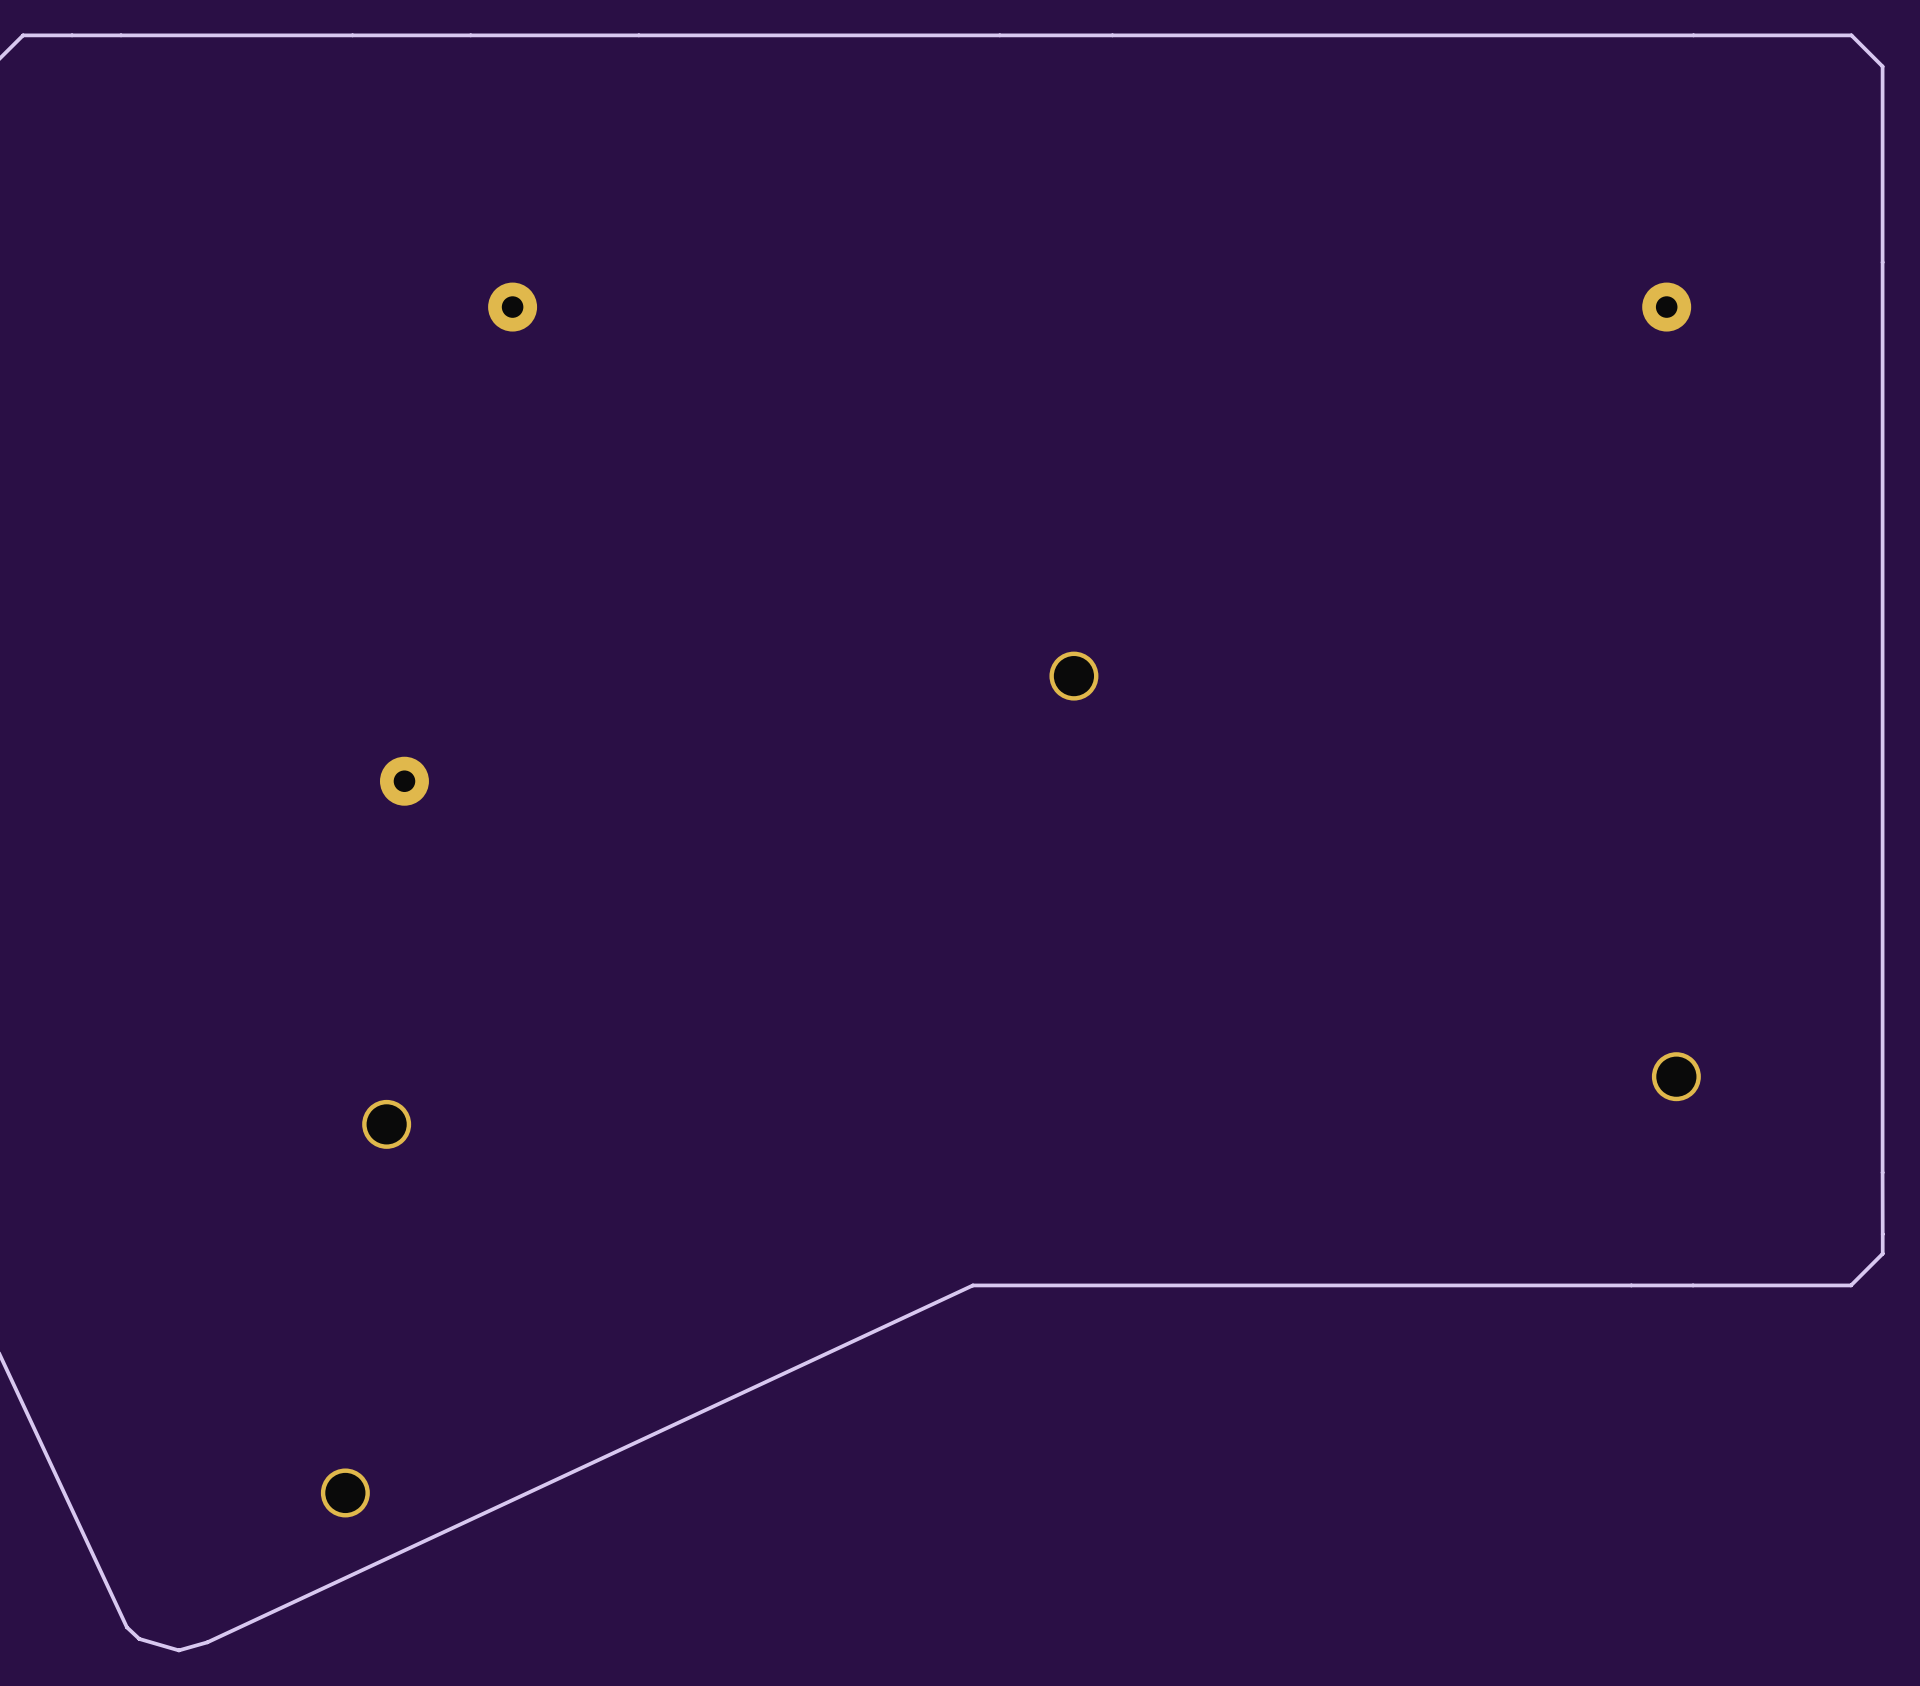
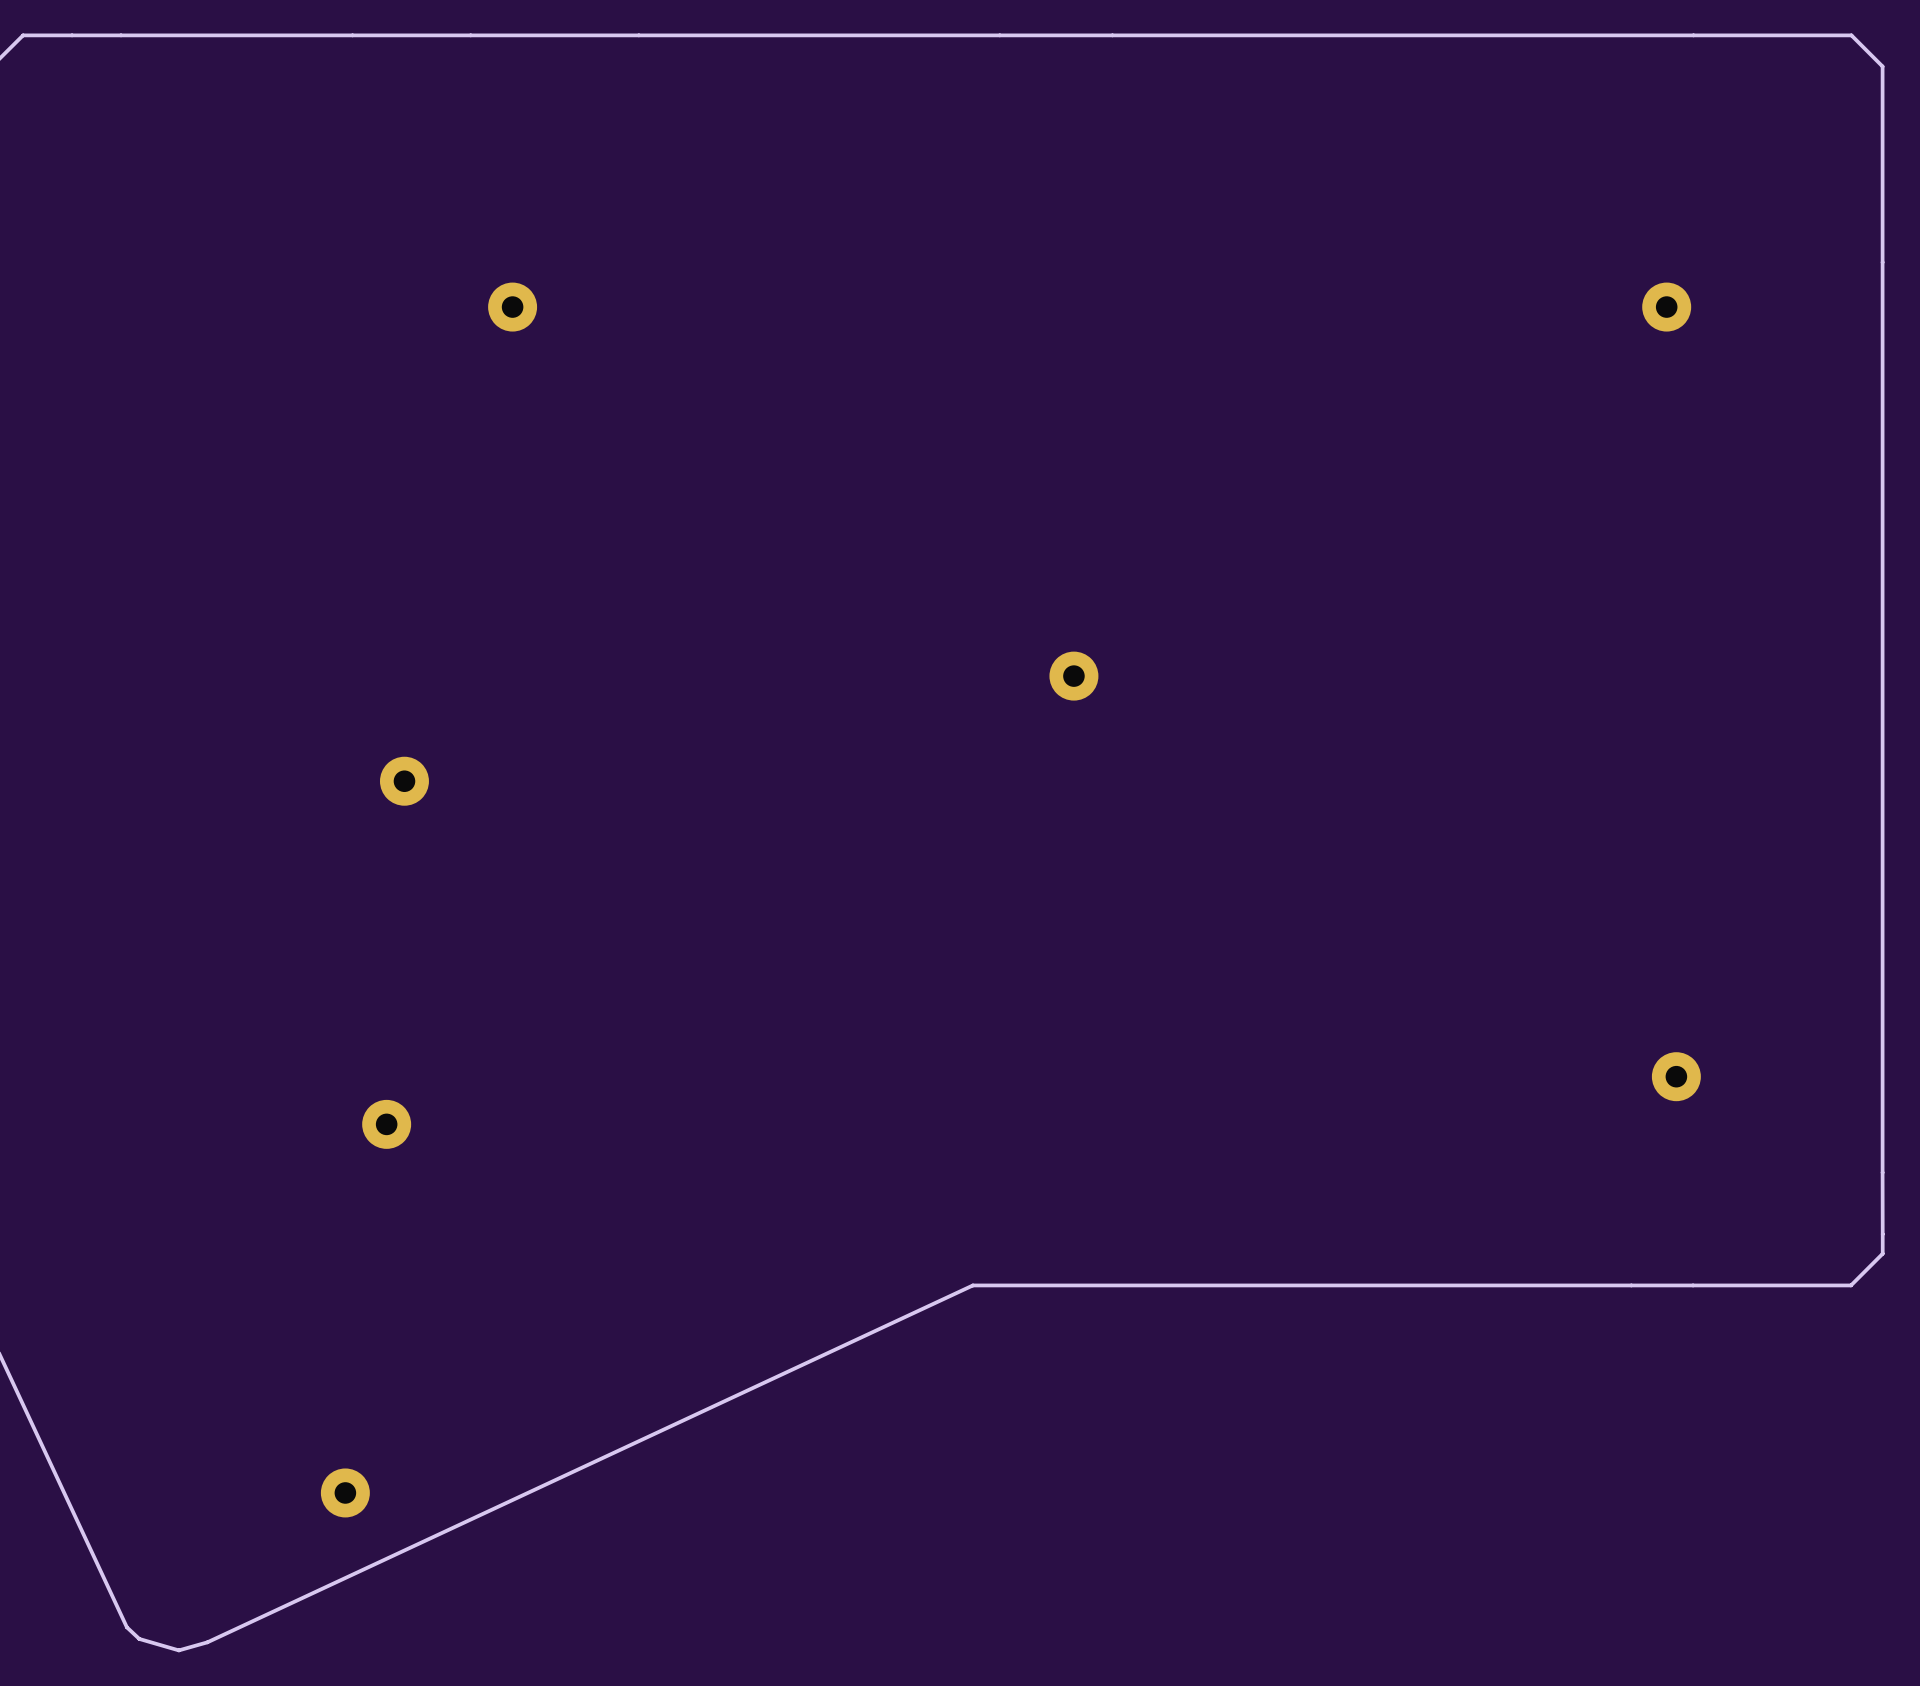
part footprint: [1049, 651, 1099, 701] -> [1049, 651, 1099, 701]
part footprint: [1651, 1052, 1701, 1102] -> [1651, 1052, 1701, 1102]
part footprint: [362, 1099, 412, 1149] -> [362, 1099, 412, 1149]
part footprint: [320, 1468, 370, 1518] -> [320, 1468, 370, 1518]

